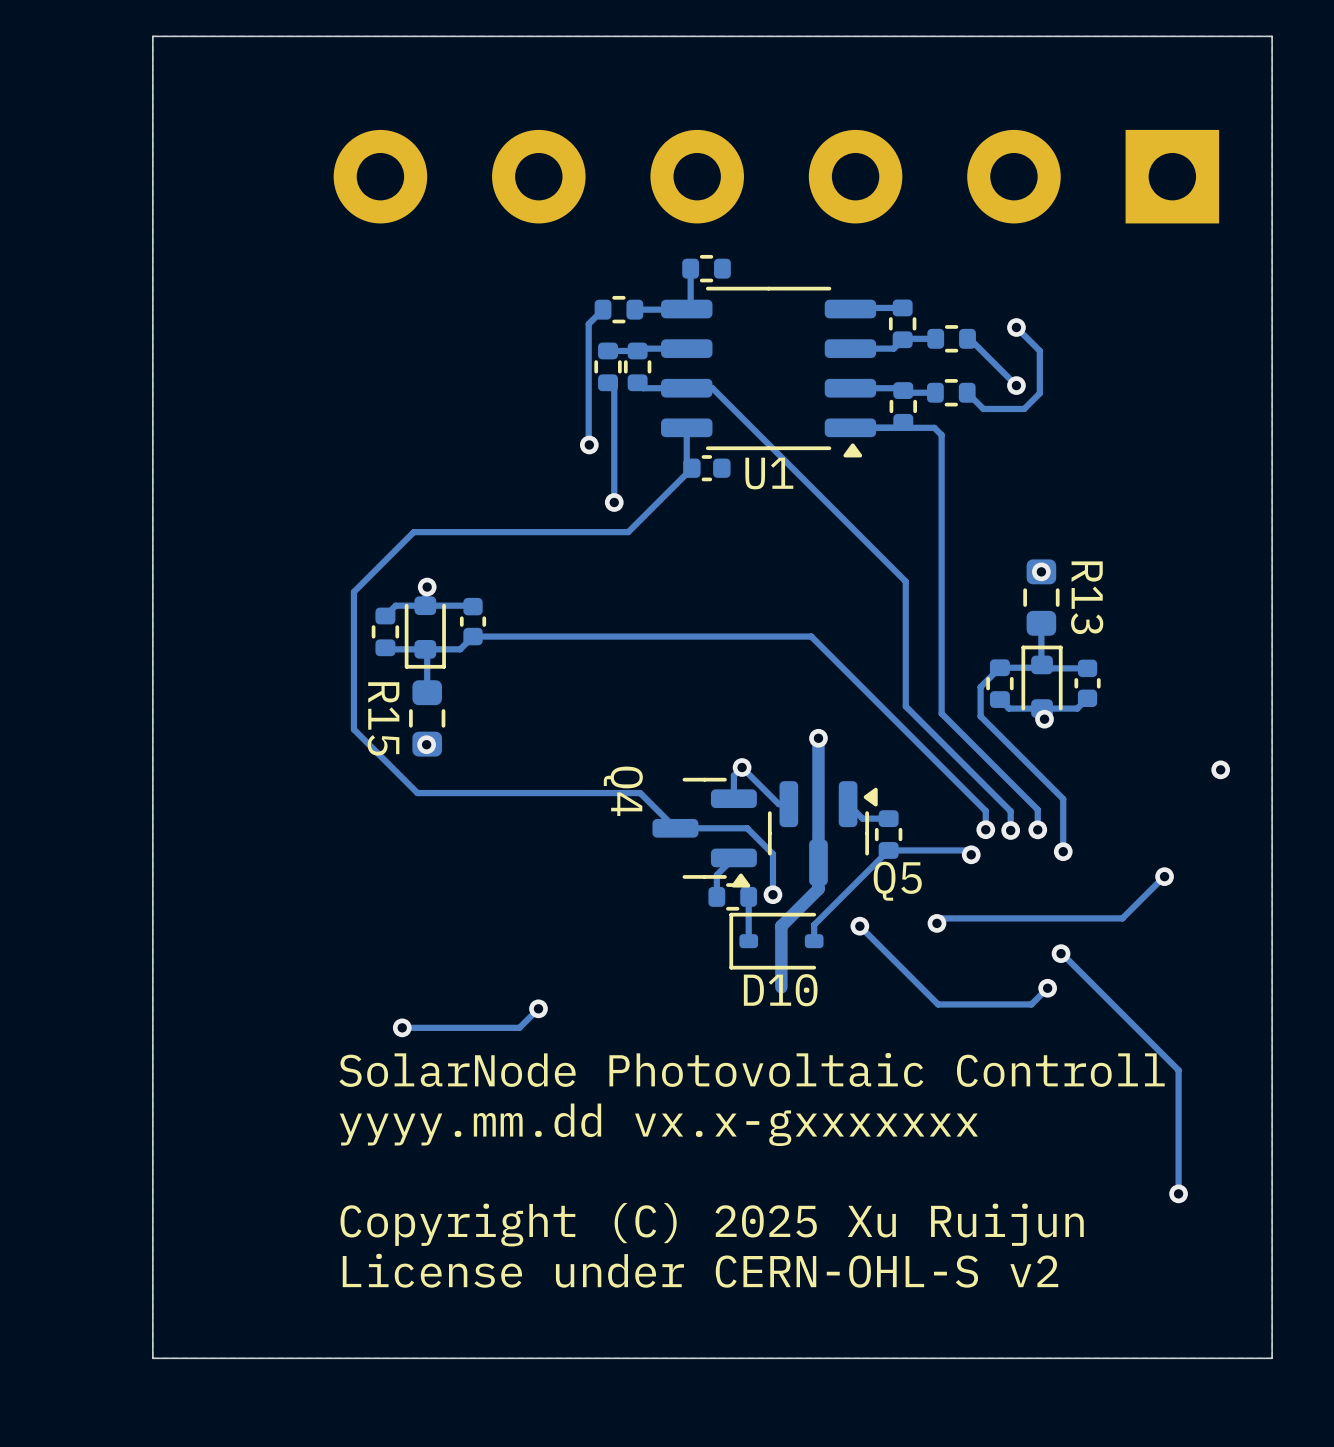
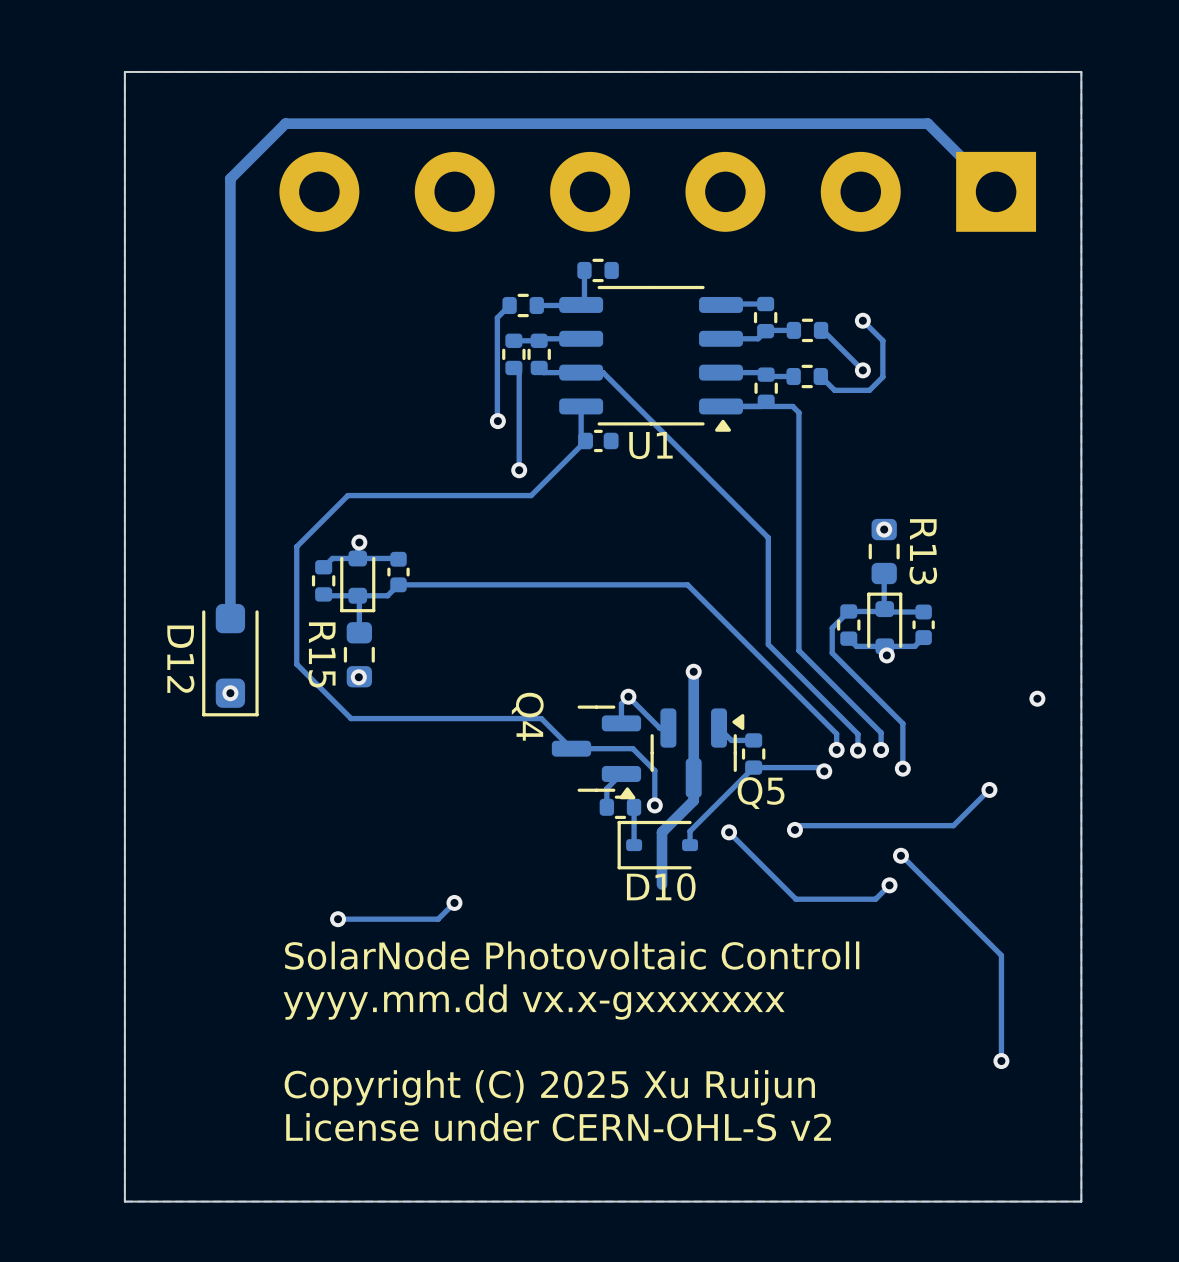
track: none -> (996, 191) (927, 123) (285, 123) (230, 178) (230, 618)
D12: none -> (230, 660)
via: none -> (230, 693)

